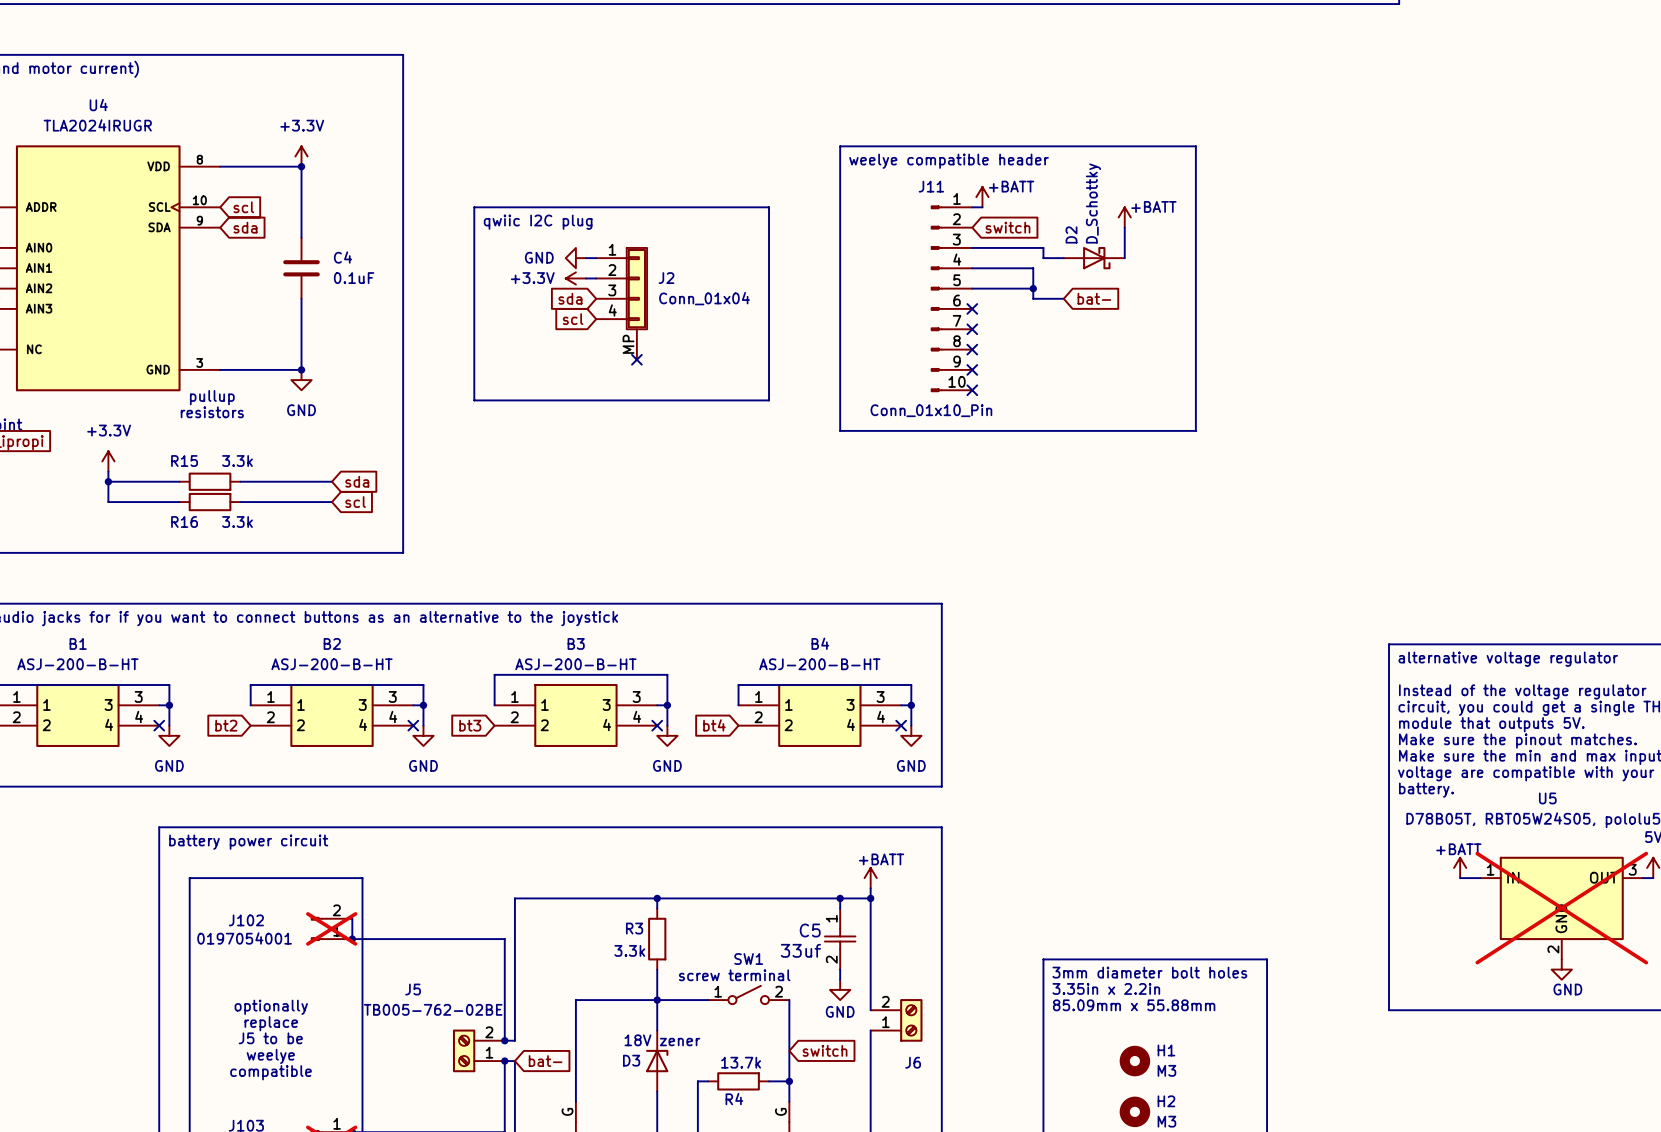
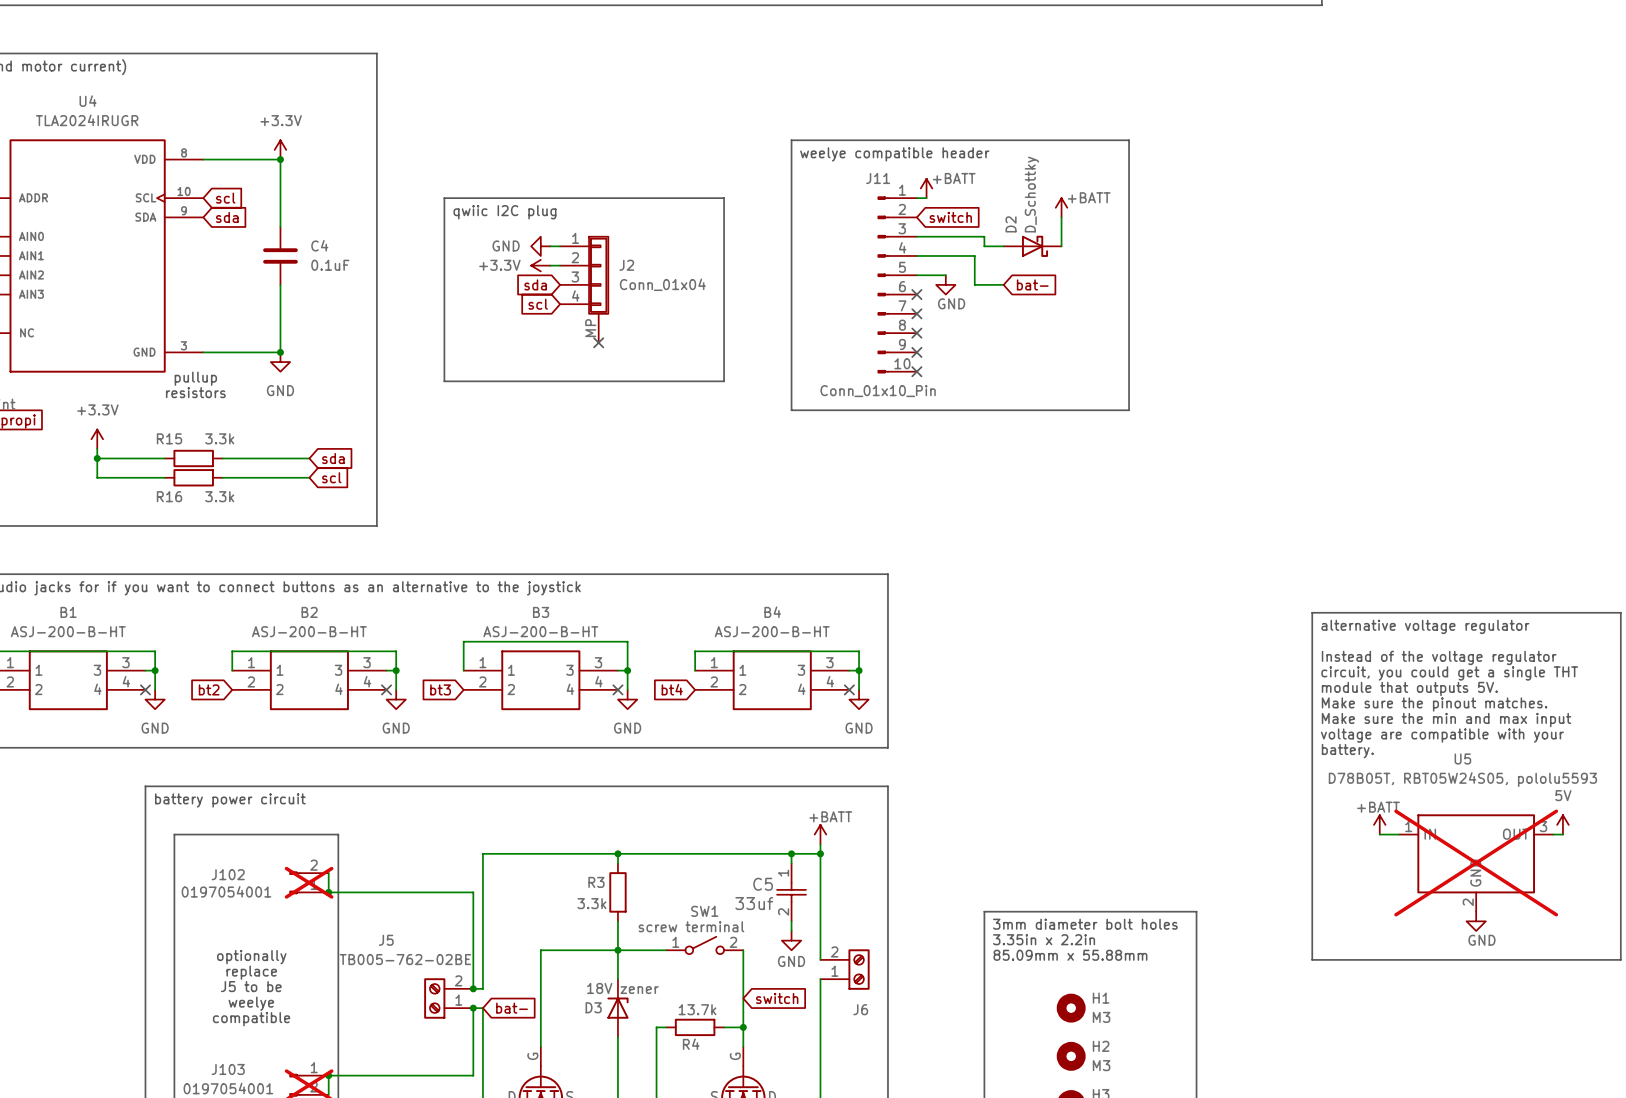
wire: (1002, 288) (1033, 288) -> none
junction: (1033, 288) -> none
power symbol: none -> GND (945, 284)

